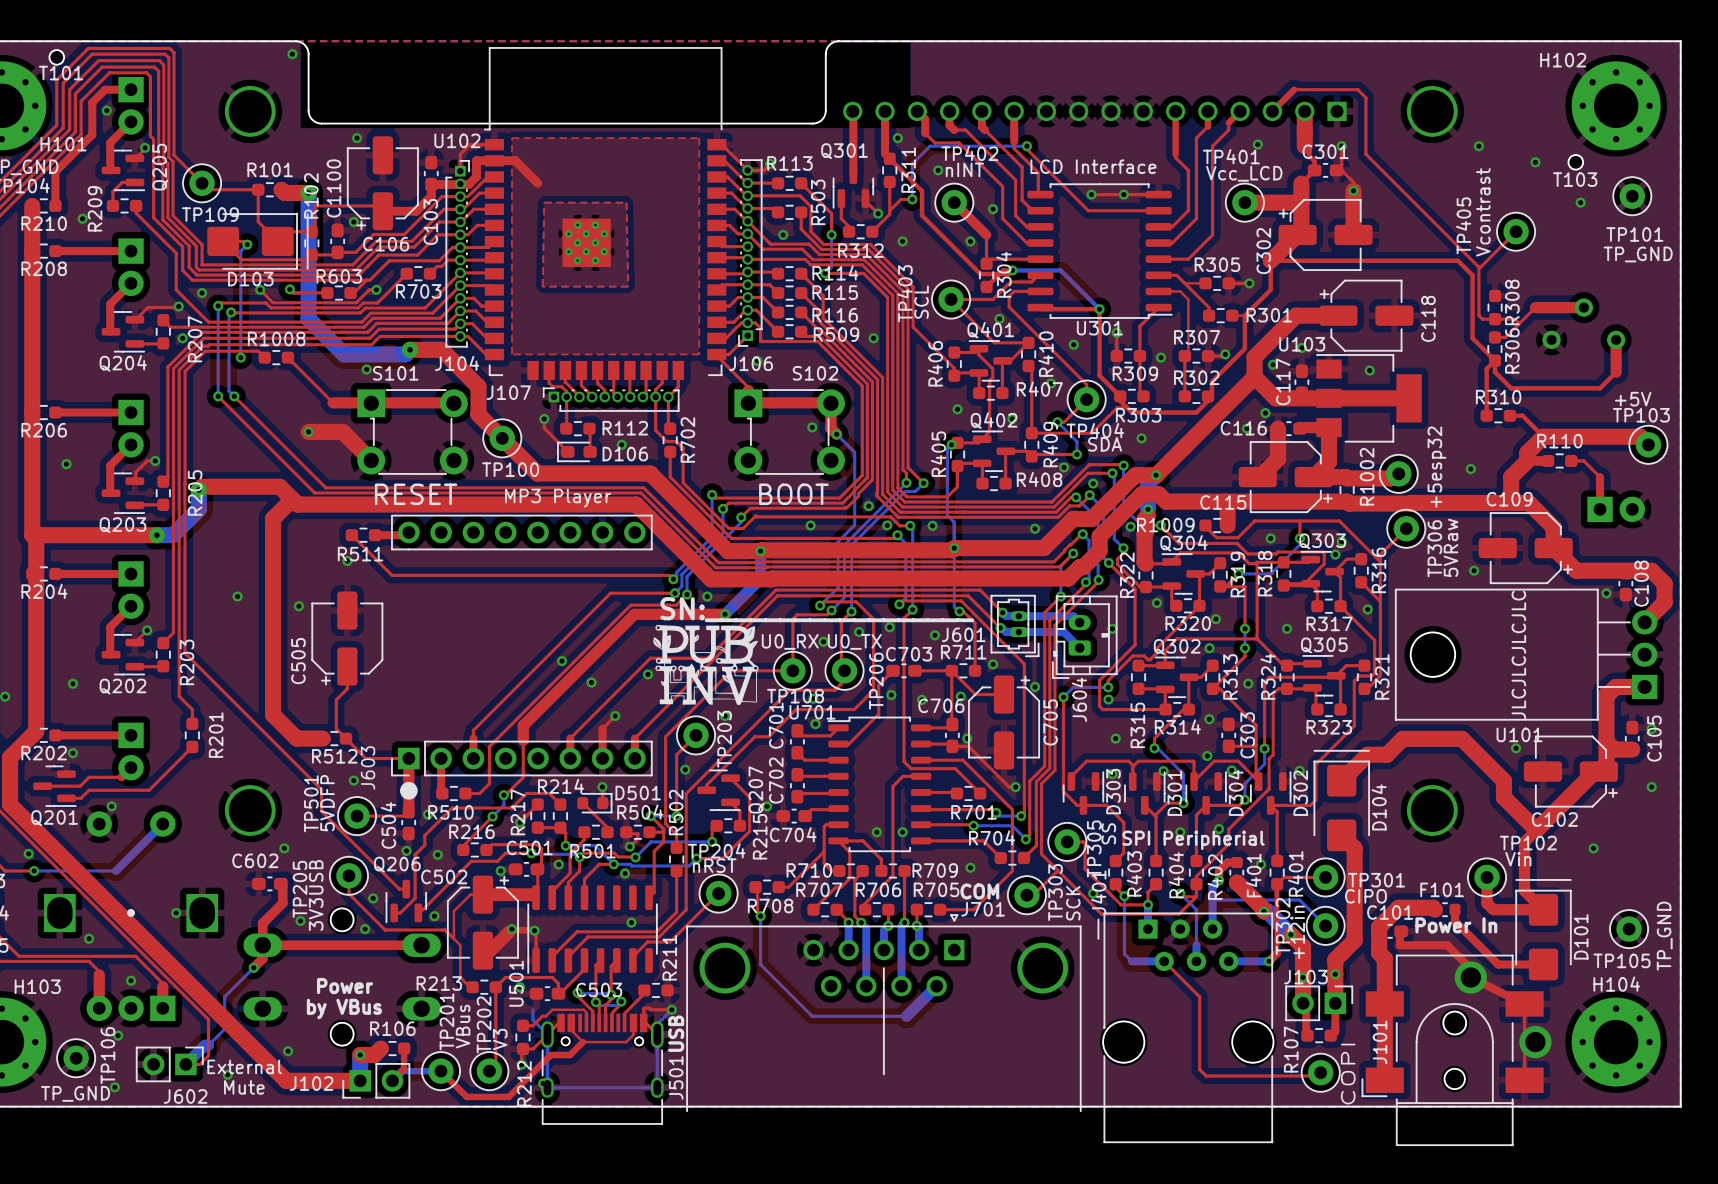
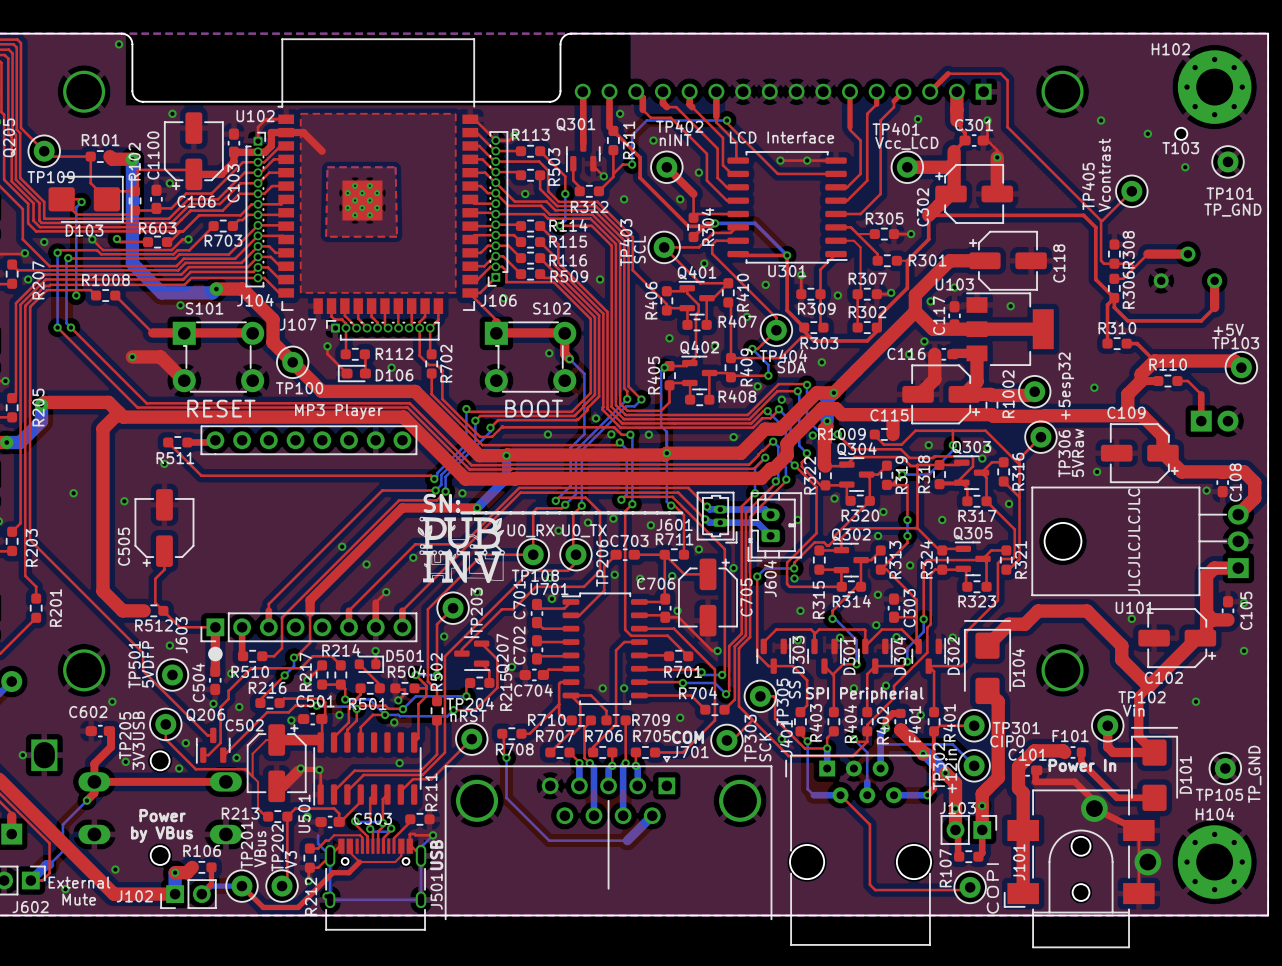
top track: (357, 816) (404, 816) -> none

